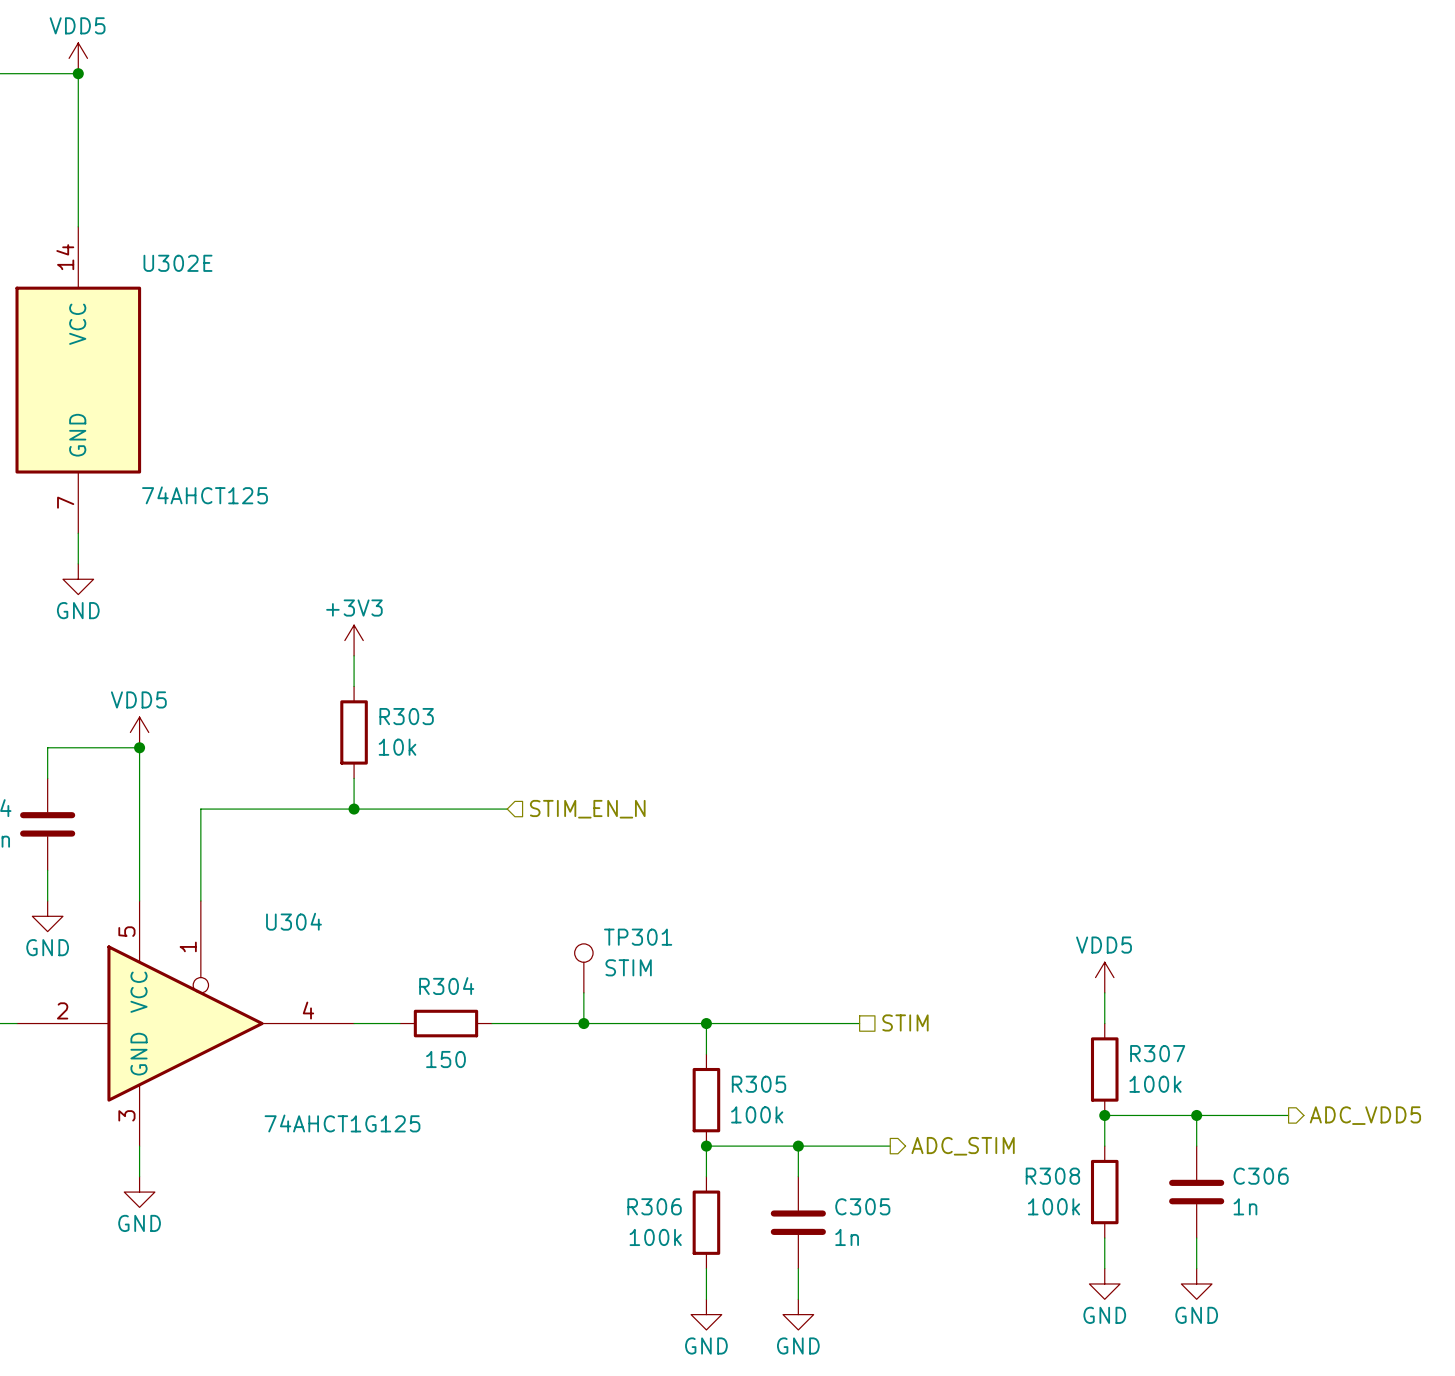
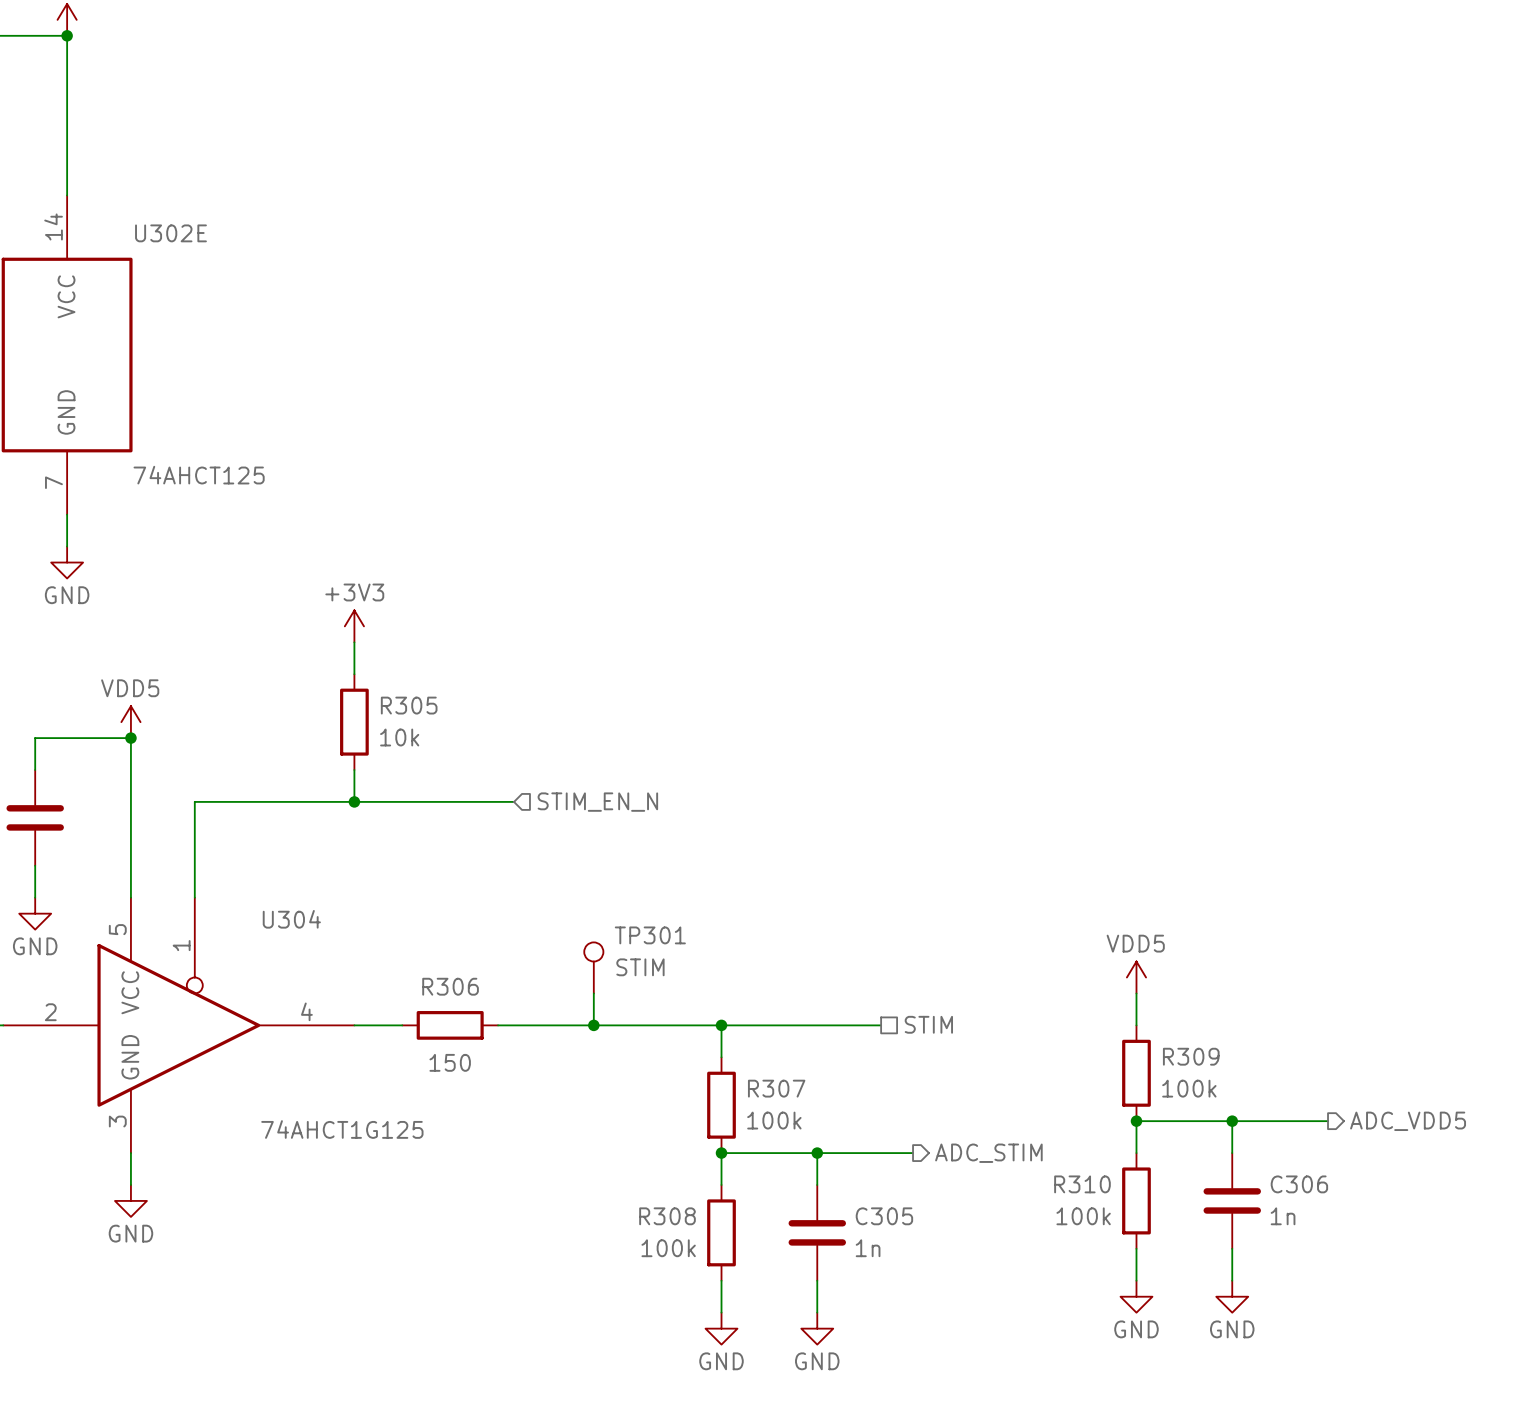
R303 name: R303 (406, 716) -> R305 (409, 705)
R304 name: R304 (446, 986) -> R306 (450, 986)
R307 name: R307 (1157, 1053) -> R309 (1191, 1056)
R305 name: R305 (758, 1084) -> R307 (776, 1088)
R308 name: R308 (1052, 1176) -> R310 (1082, 1184)
R306 name: R306 (654, 1206) -> R308 (667, 1216)

